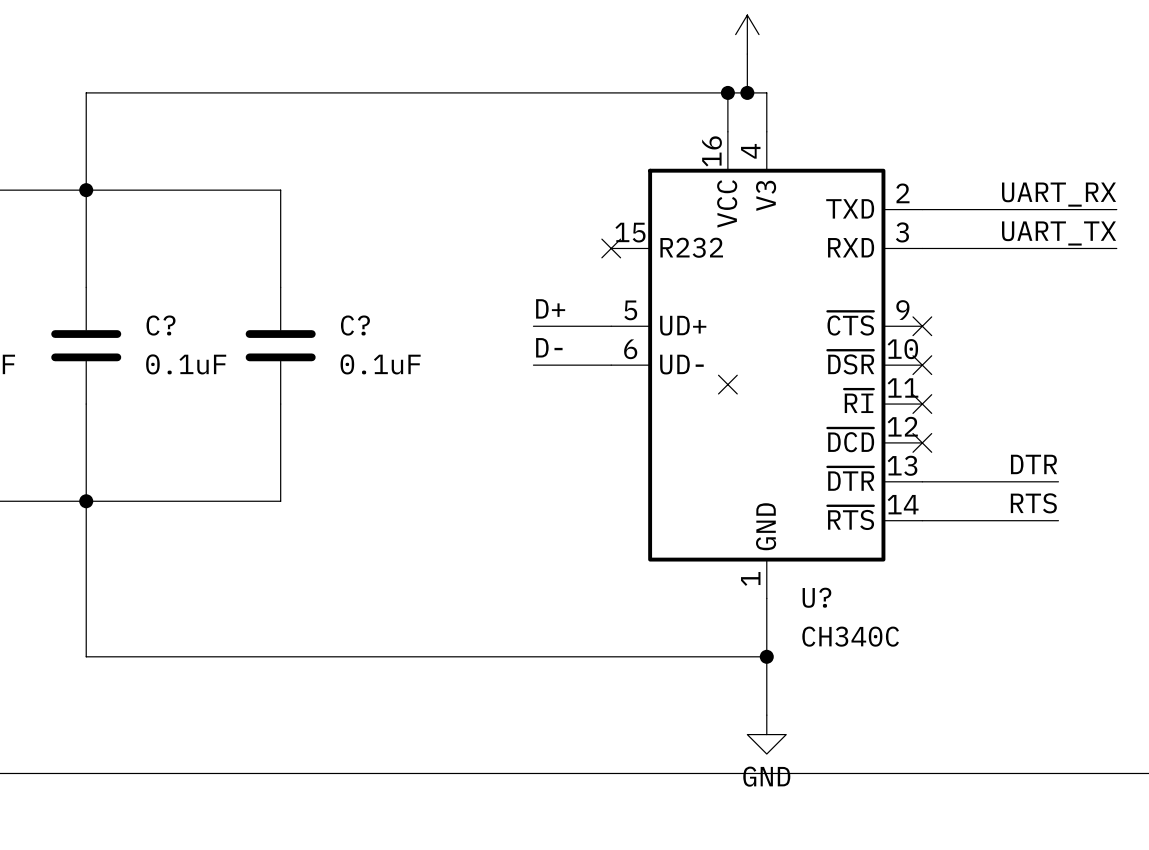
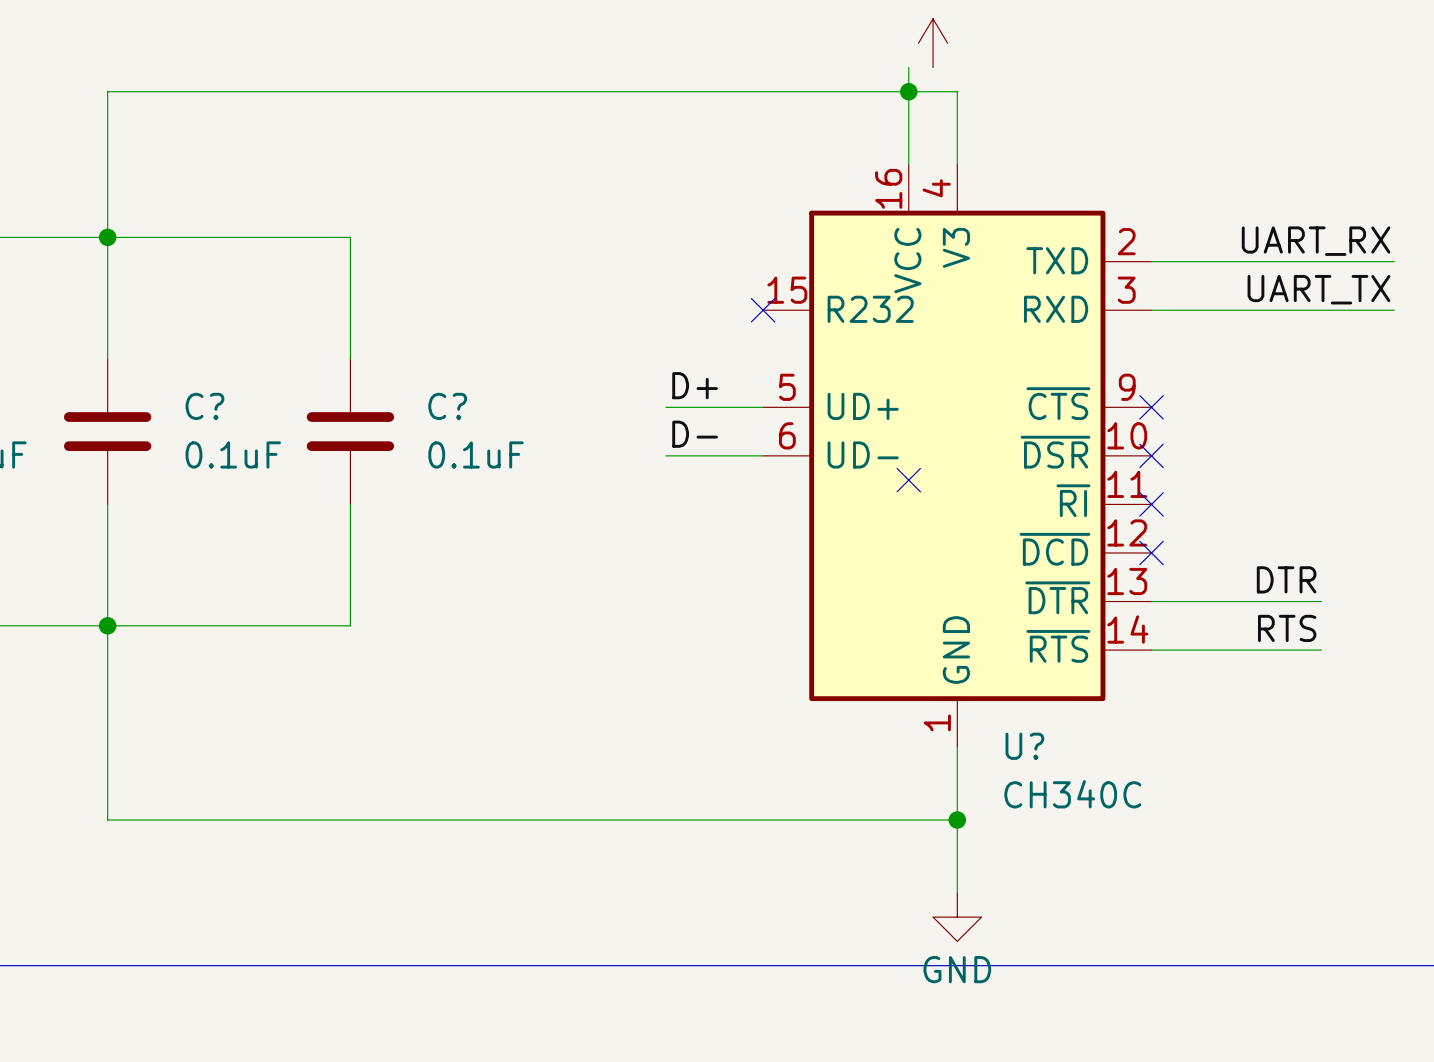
wire: (747, 54) (747, 92) -> (908, 67) (908, 116)
junction: none -> (908, 91)
wire: (86, 92) (766, 92) -> (107, 116) (107, 91) (957, 91) (957, 116)
junction: (727, 92) -> none
junction: (747, 92) -> none

